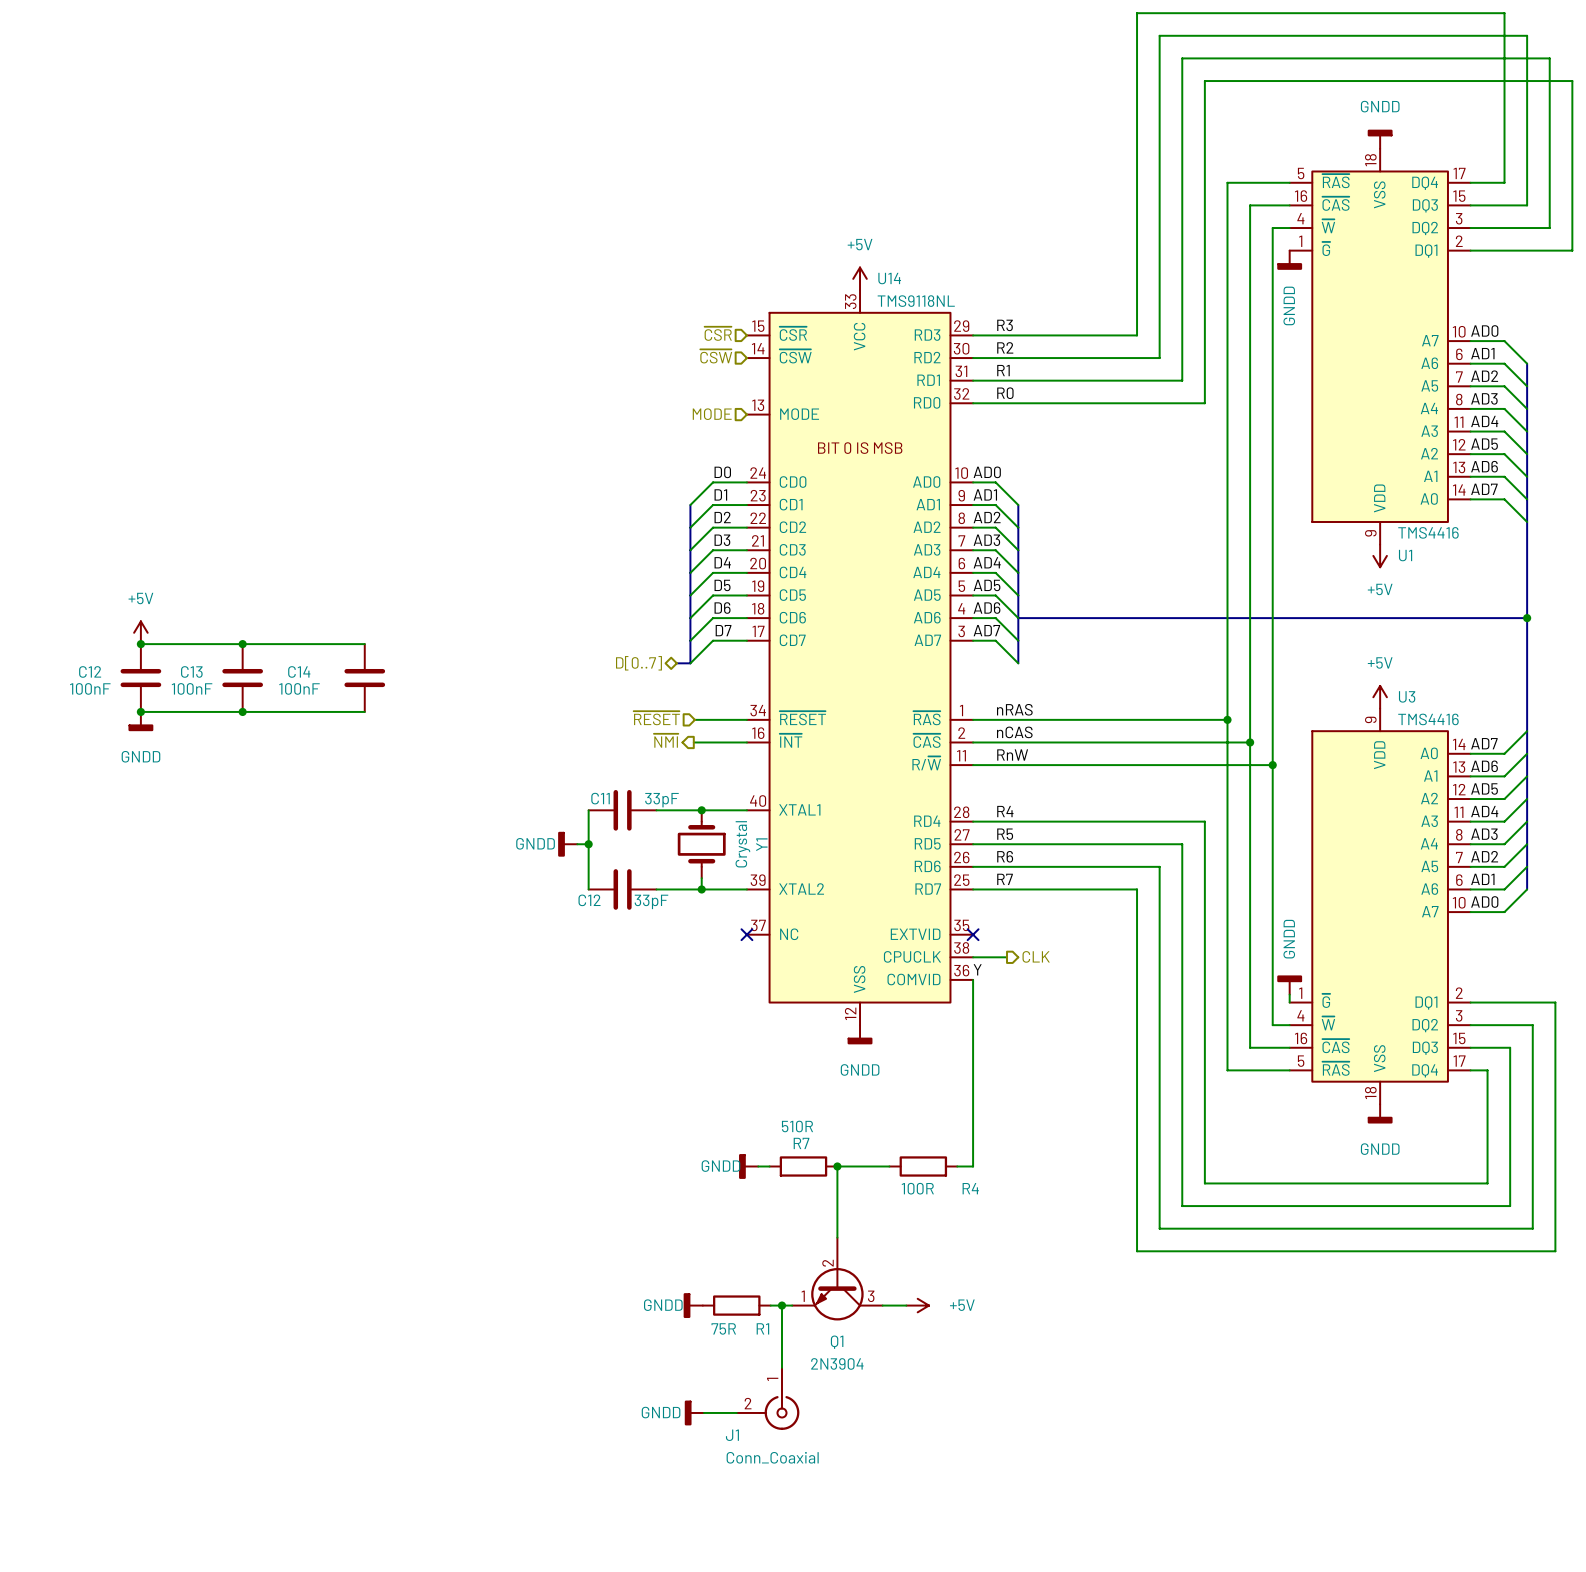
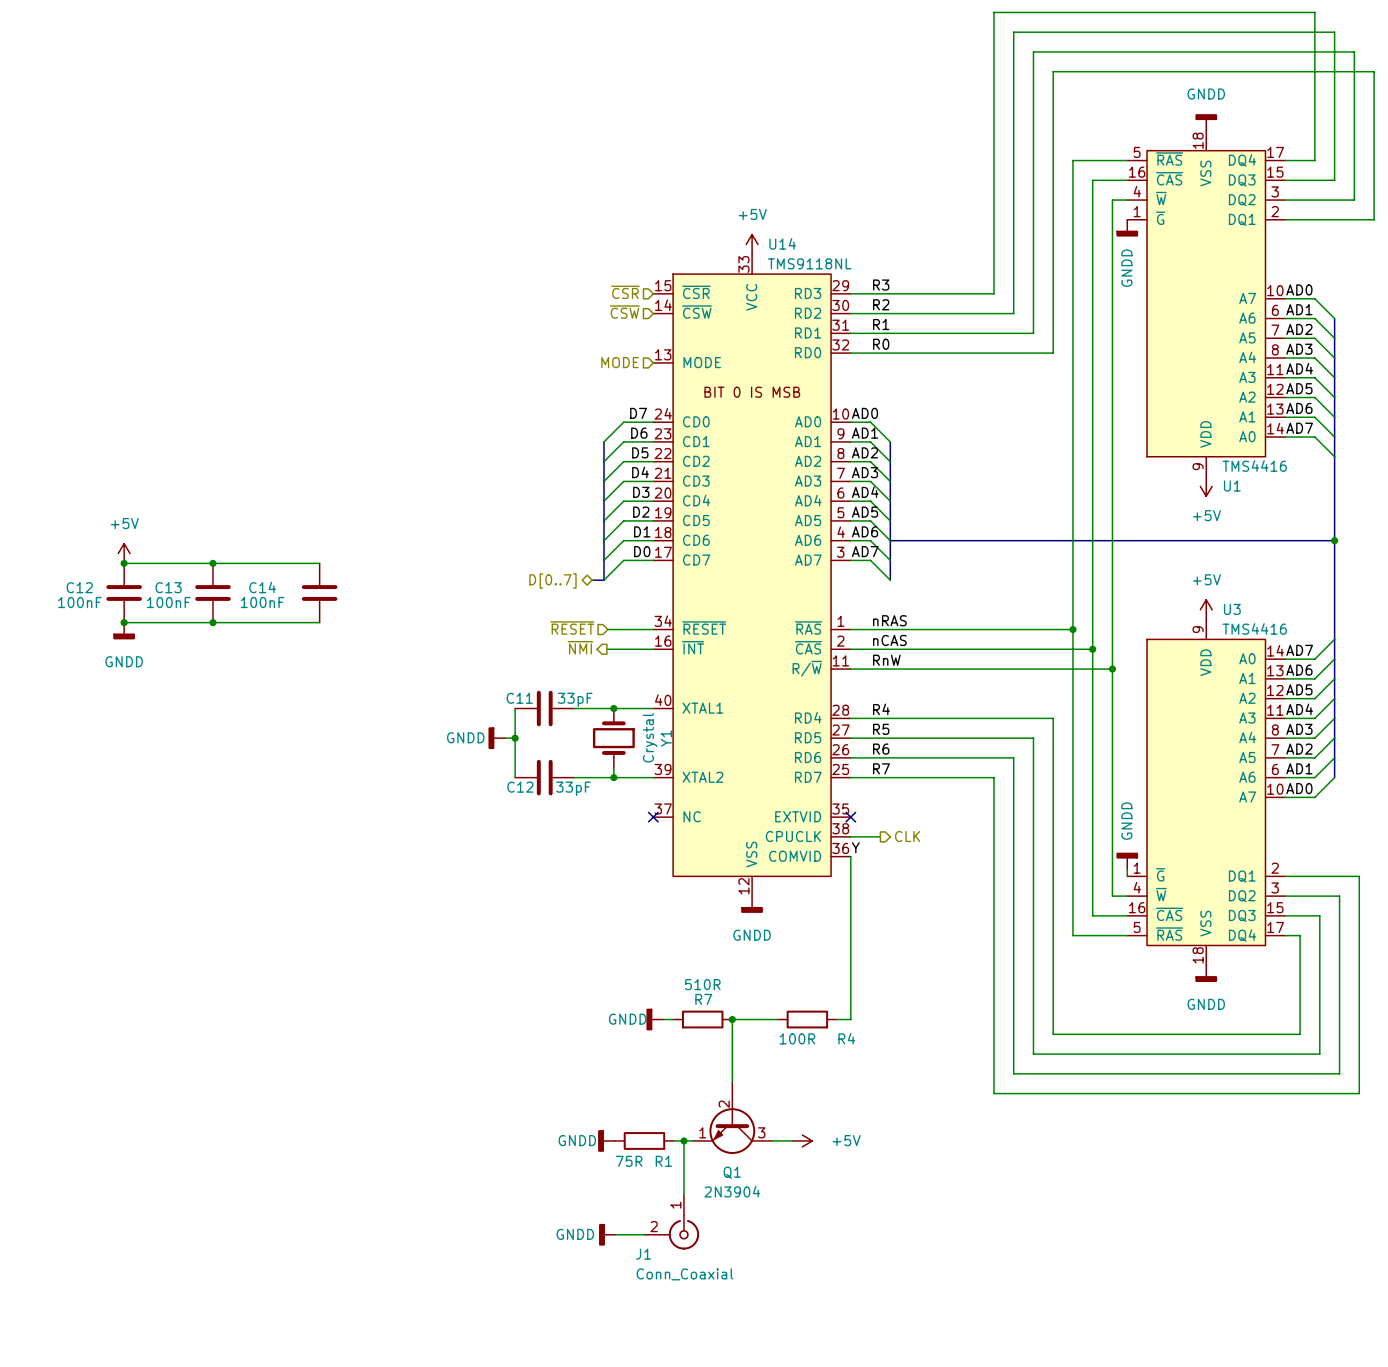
label: D0 (722, 472) -> D7 (638, 413)
label: D1 (720, 494) -> D6 (639, 433)
label: D2 (722, 517) -> D5 (640, 452)
label: D3 (722, 540) -> D4 (640, 472)
label: D4 (722, 562) -> D3 (641, 492)
label: D5 (722, 585) -> D2 (641, 512)
label: D6 (722, 608) -> none
label: none -> D1 (642, 531)
label: D7 (723, 630) -> D0 (642, 551)

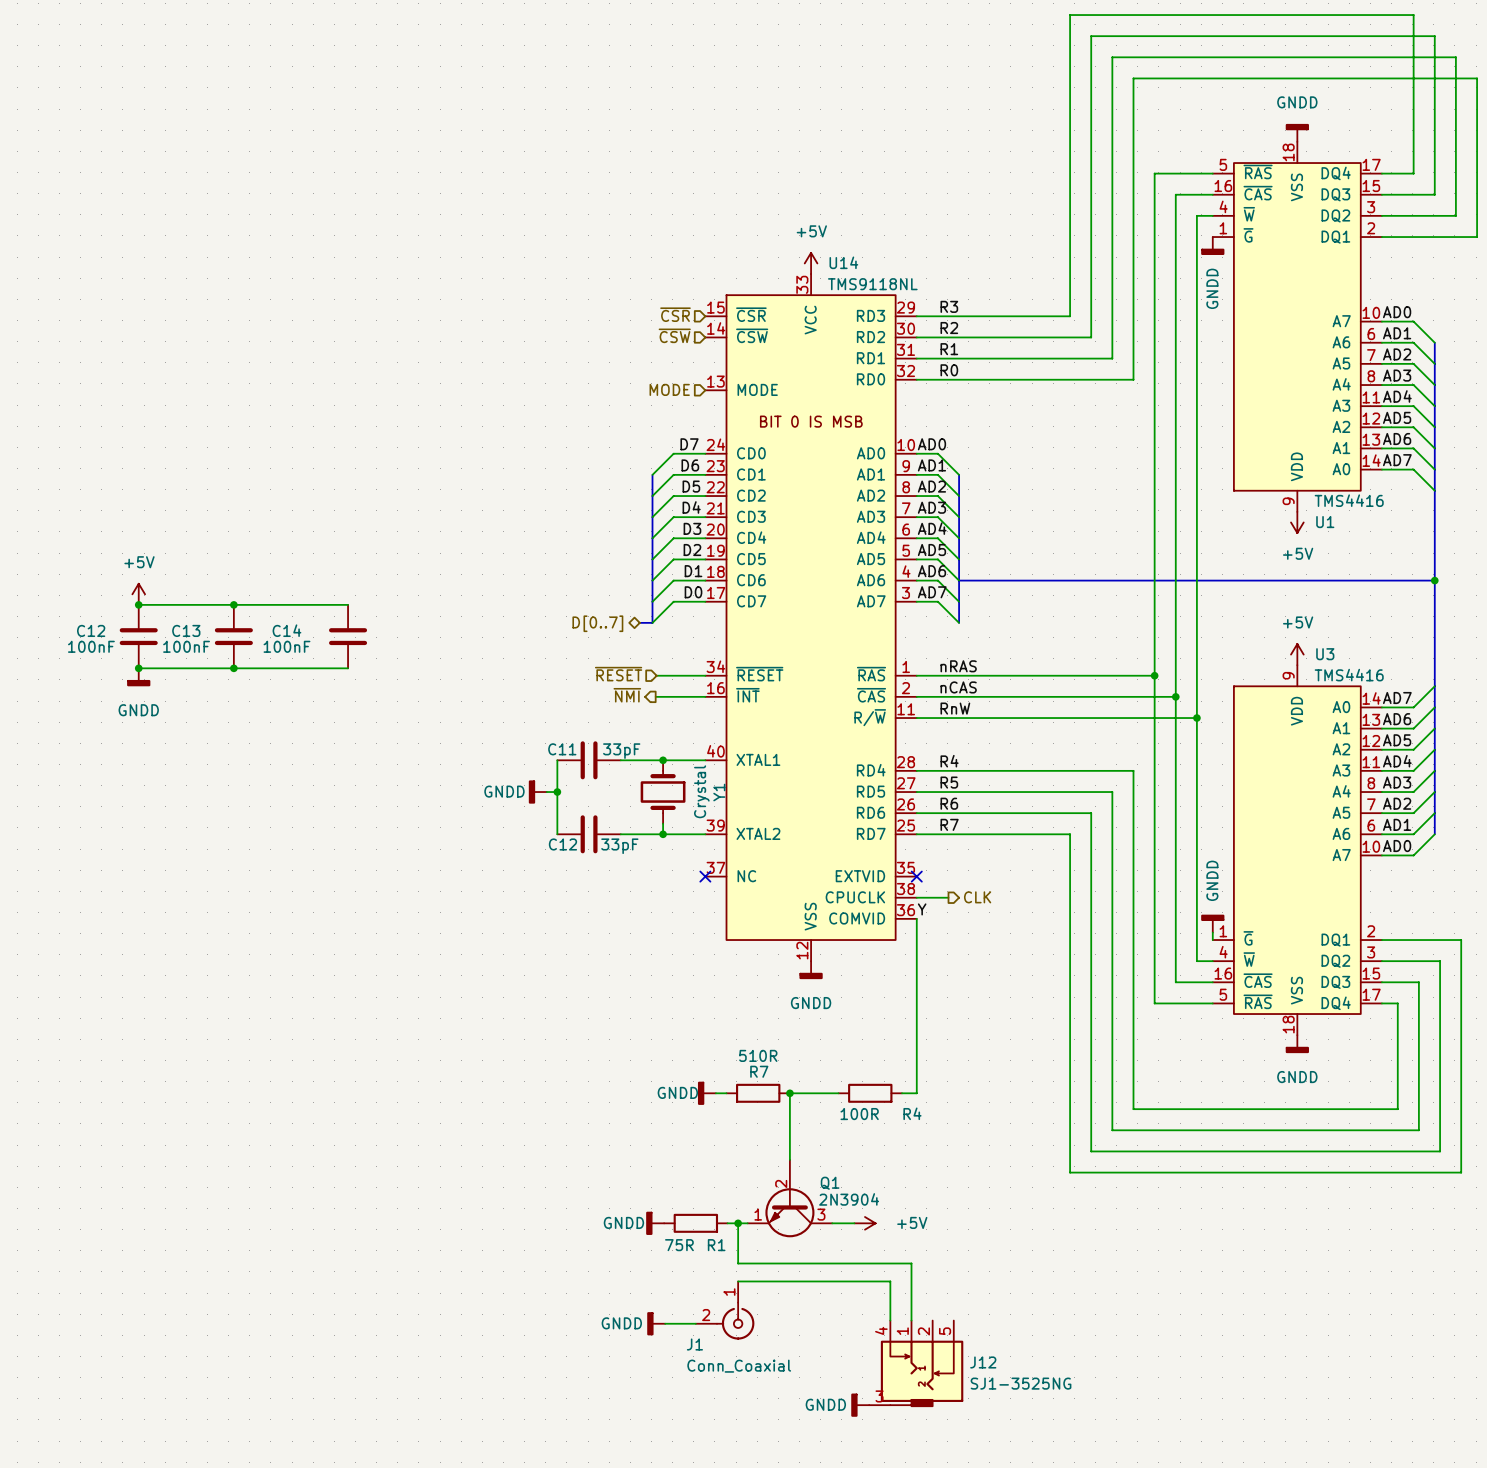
Q1 name position: Q1 (732, 1172) -> Q1 (830, 1183)
wire: (683, 1178) (683, 1195) -> (890, 1320) (890, 1281) (738, 1281)
wire: none -> (738, 1263) (911, 1263) (911, 1320)
Q1 value position: 2N3904 (732, 1191) -> 2N3904 (849, 1199)
J12: none -> SJ1-3525NG (916, 1363)
power symbol: none -> GNDD (860, 1405)

